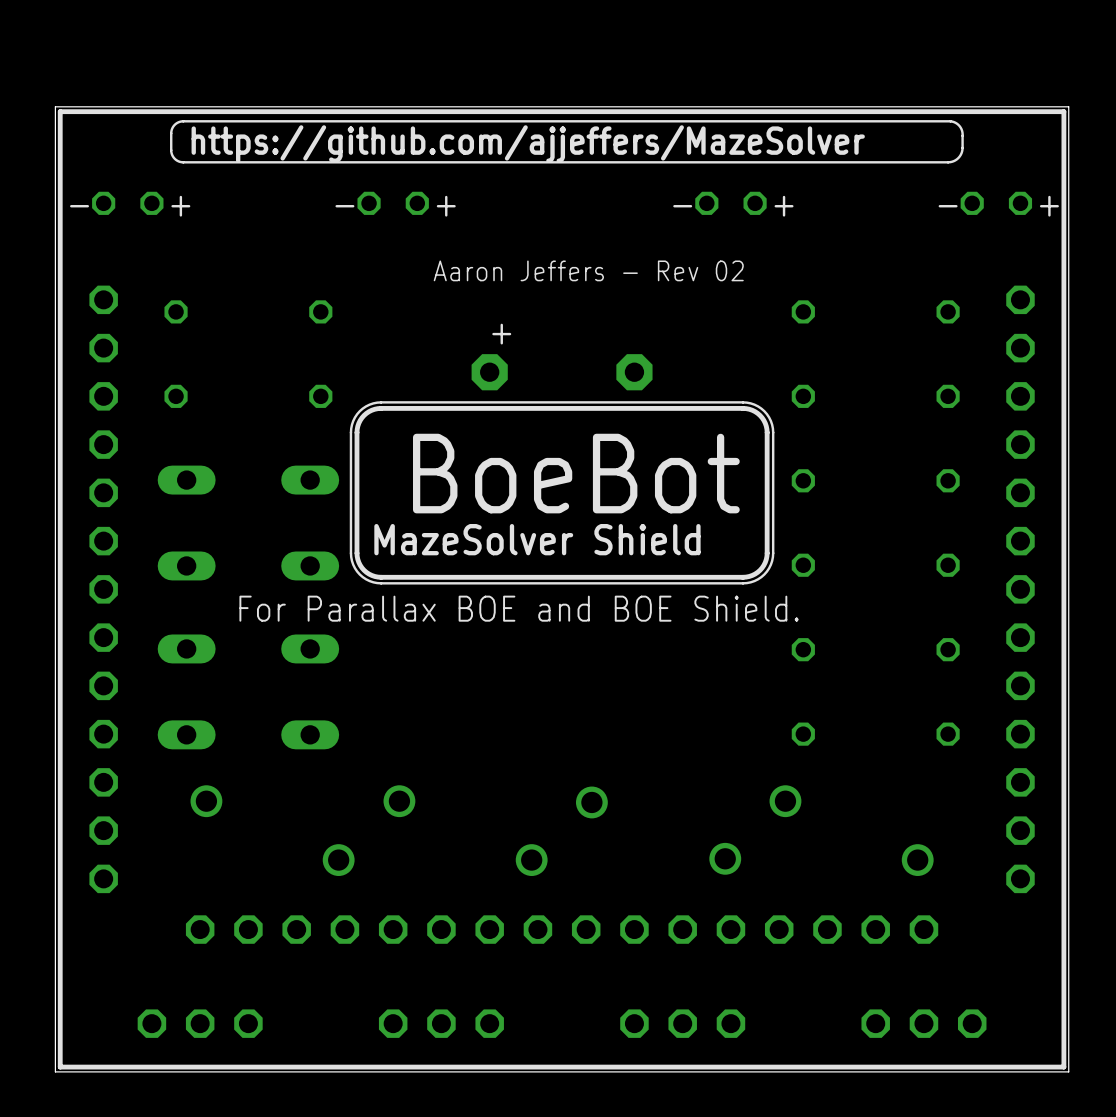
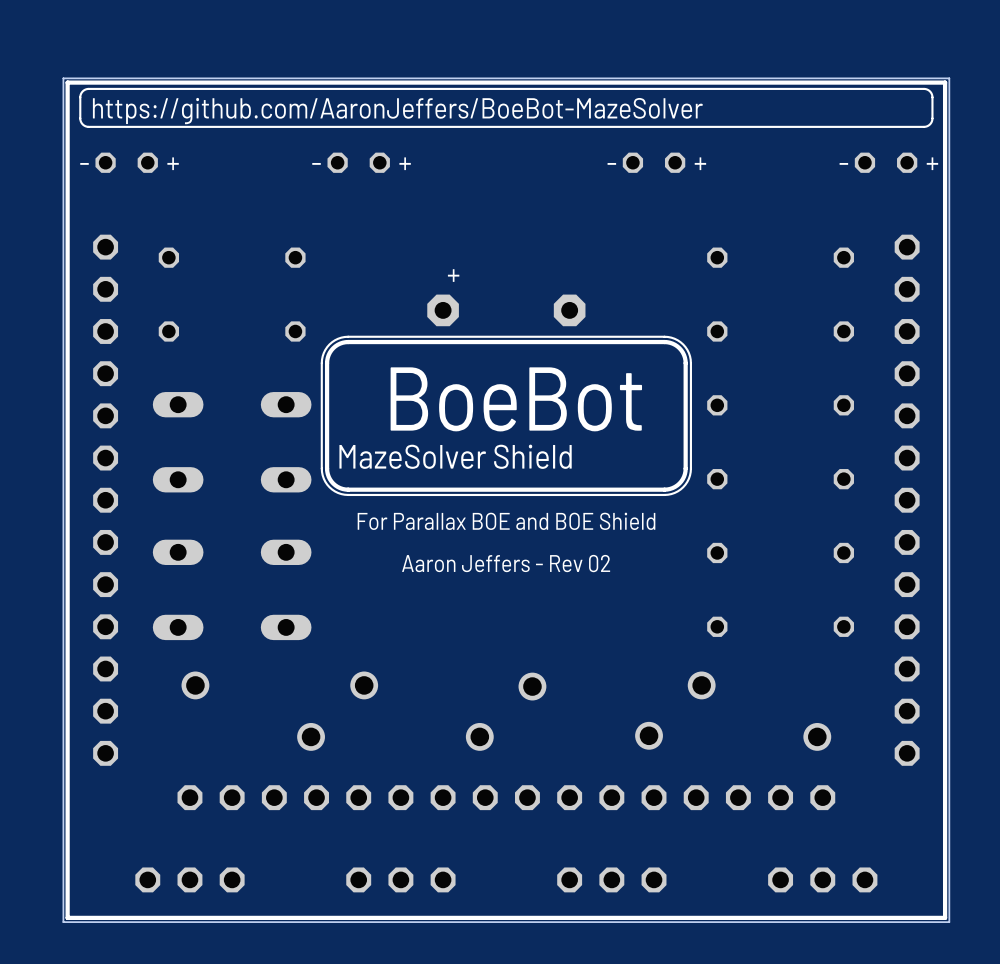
text: https://github.com/ajjeffers/MazeSolver (528, 144) -> https://github.com/AaronJeffers/BoeBot-MazeSolver (397, 111)
line: (948, 162) (958, 158) (962, 147) (961, 128) (956, 123) (950, 121) (183, 121) (174, 124) (171, 133) (172, 154) (175, 159) (183, 162) -> (843, 126) (927, 126) (932, 119) (931, 94) (924, 88) (88, 88) (80, 94) (80, 119) (85, 126) (175, 126)
text position: Aaron Jeffers - Rev 02 (588, 270) -> Aaron Jeffers - Rev 02 (506, 563)
text: For Parallax BOE and BOE Shield. (519, 608) -> For Parallax BOE and BOE Shield (506, 521)

